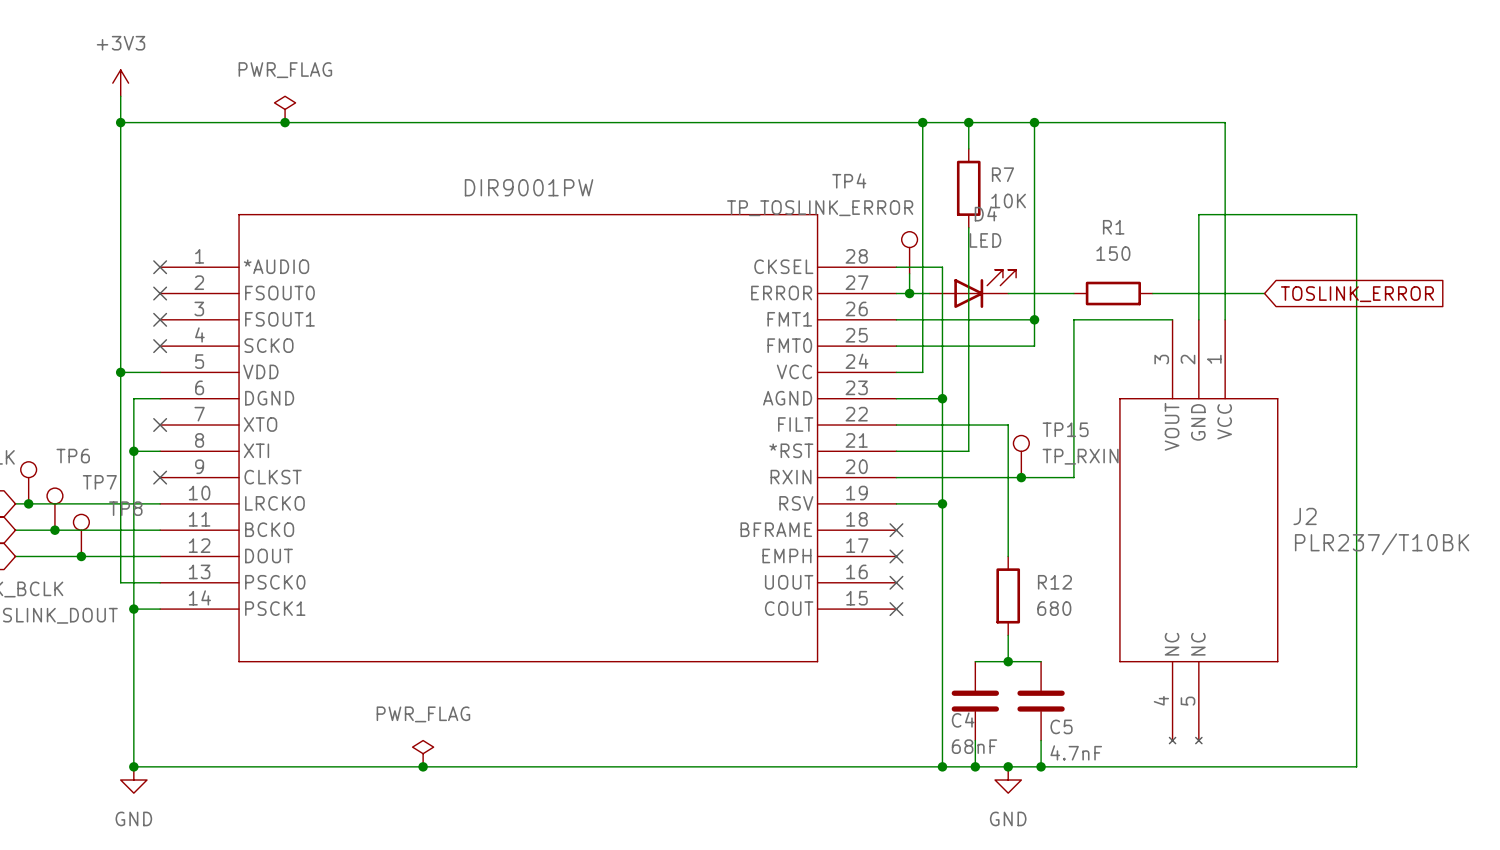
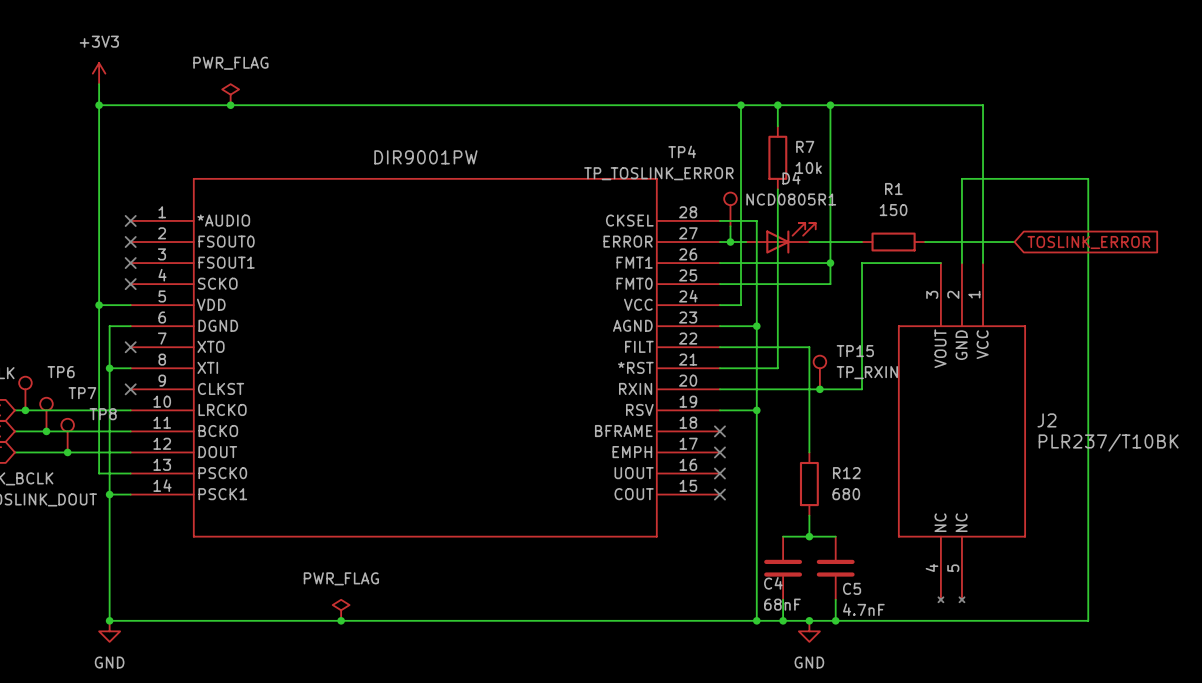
R7 value: 10K (1008, 200) -> 10k (808, 167)
D4 value: LED (985, 240) -> NCD0805R1 (791, 199)

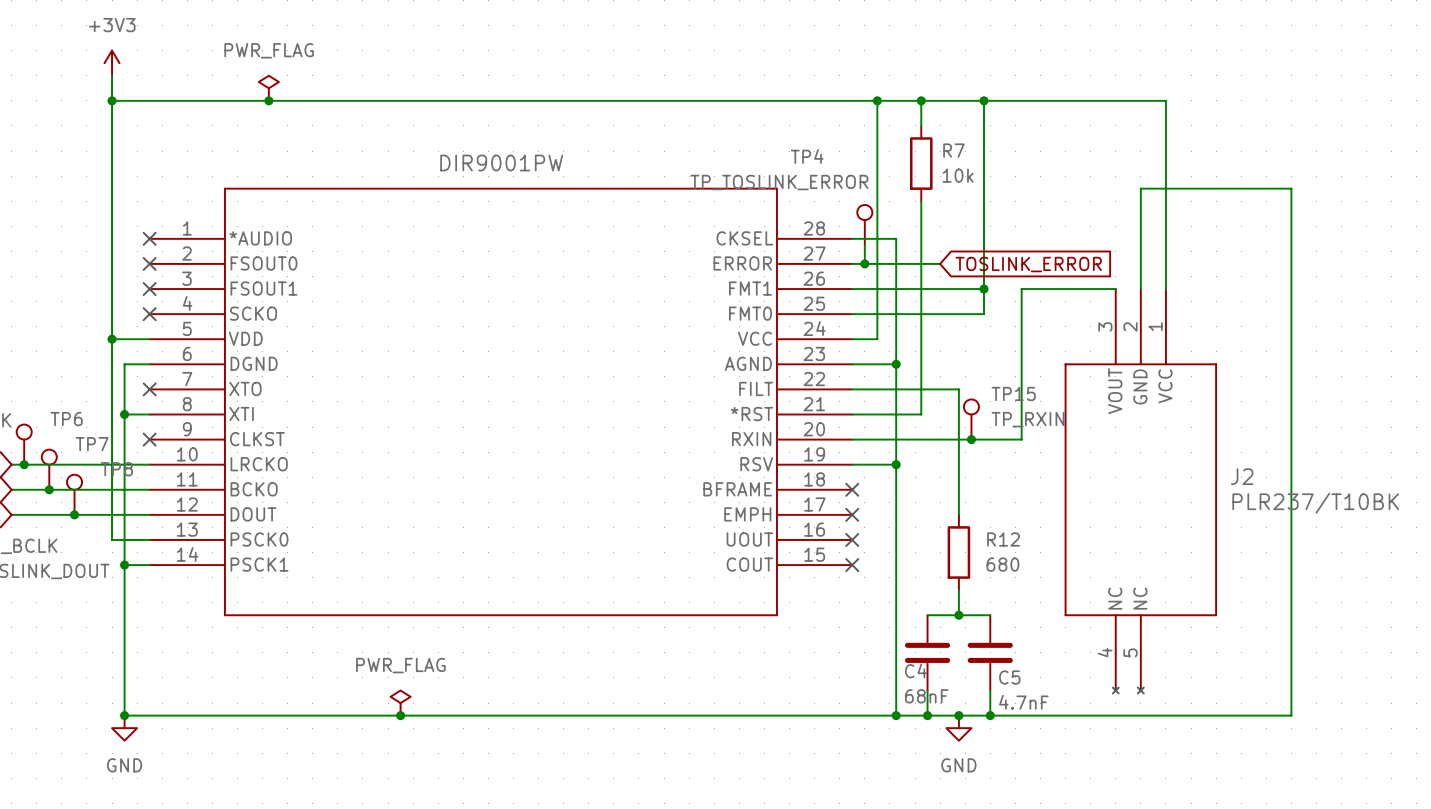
D4: NCD0805R1 (780, 238) -> none
wire: (809, 242) (862, 242) -> none
global label: none -> TOSLINK_ERROR (1028, 264)
R1: 150 (893, 242) -> none
wire: (925, 242) (1014, 242) -> none
global label: TOSLINK_ERROR (1088, 242) -> none

